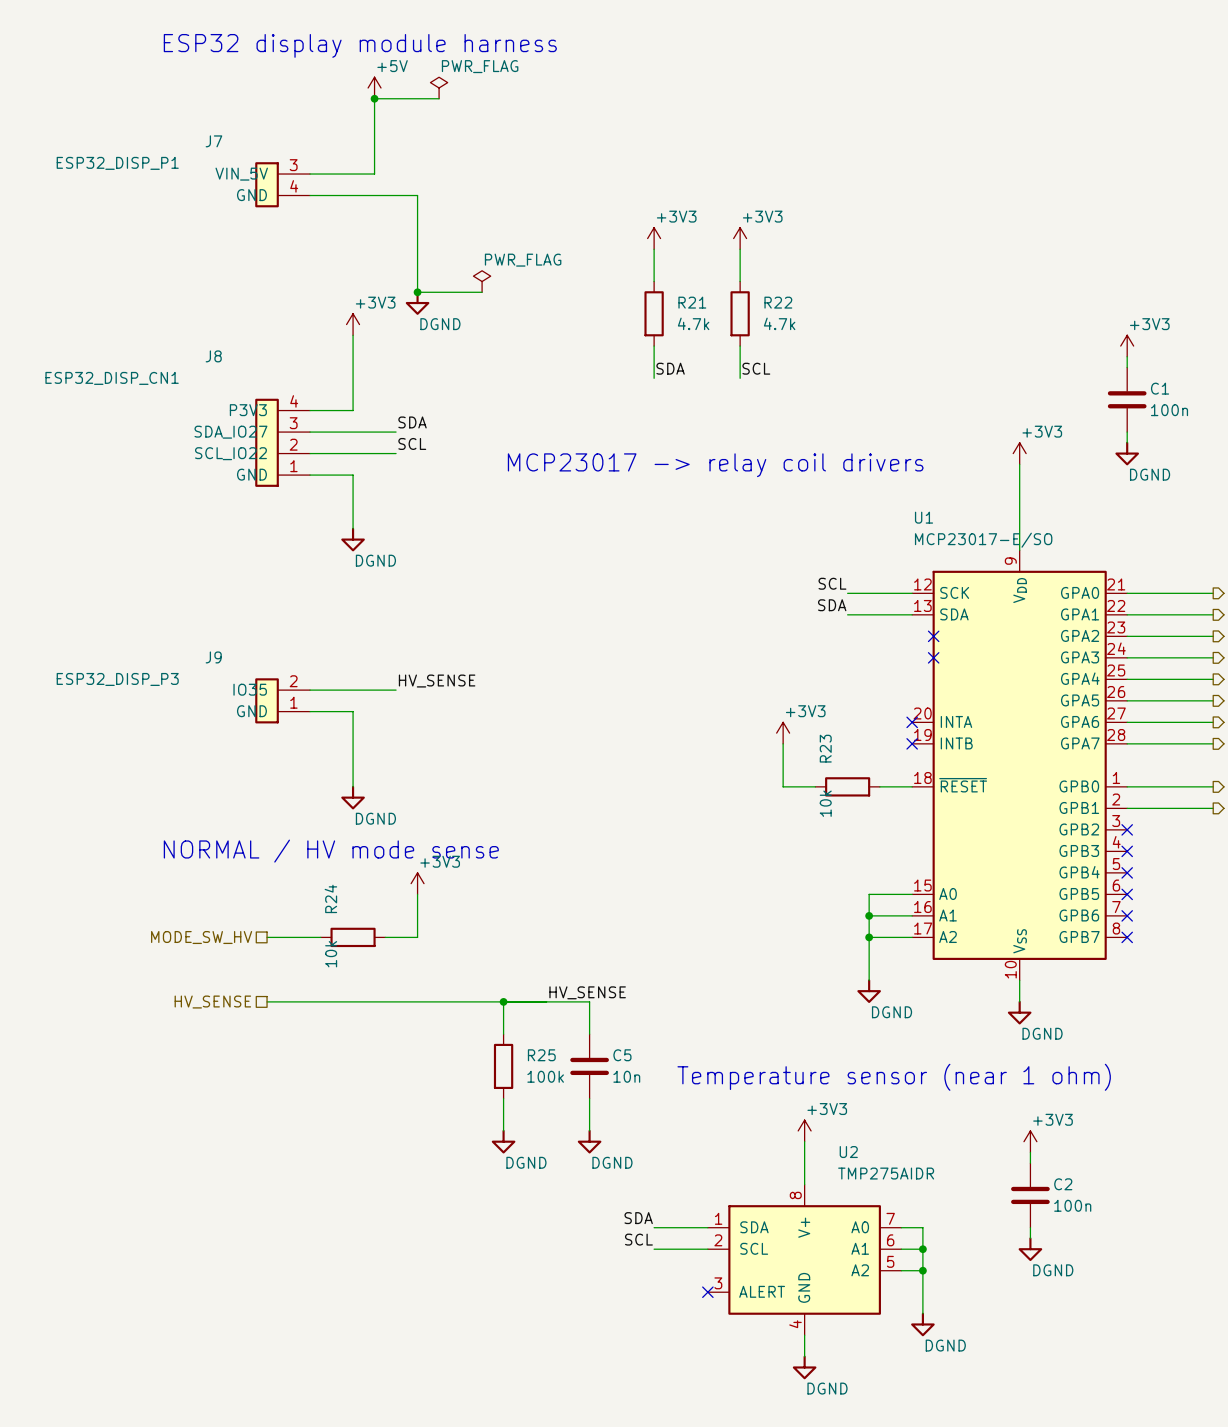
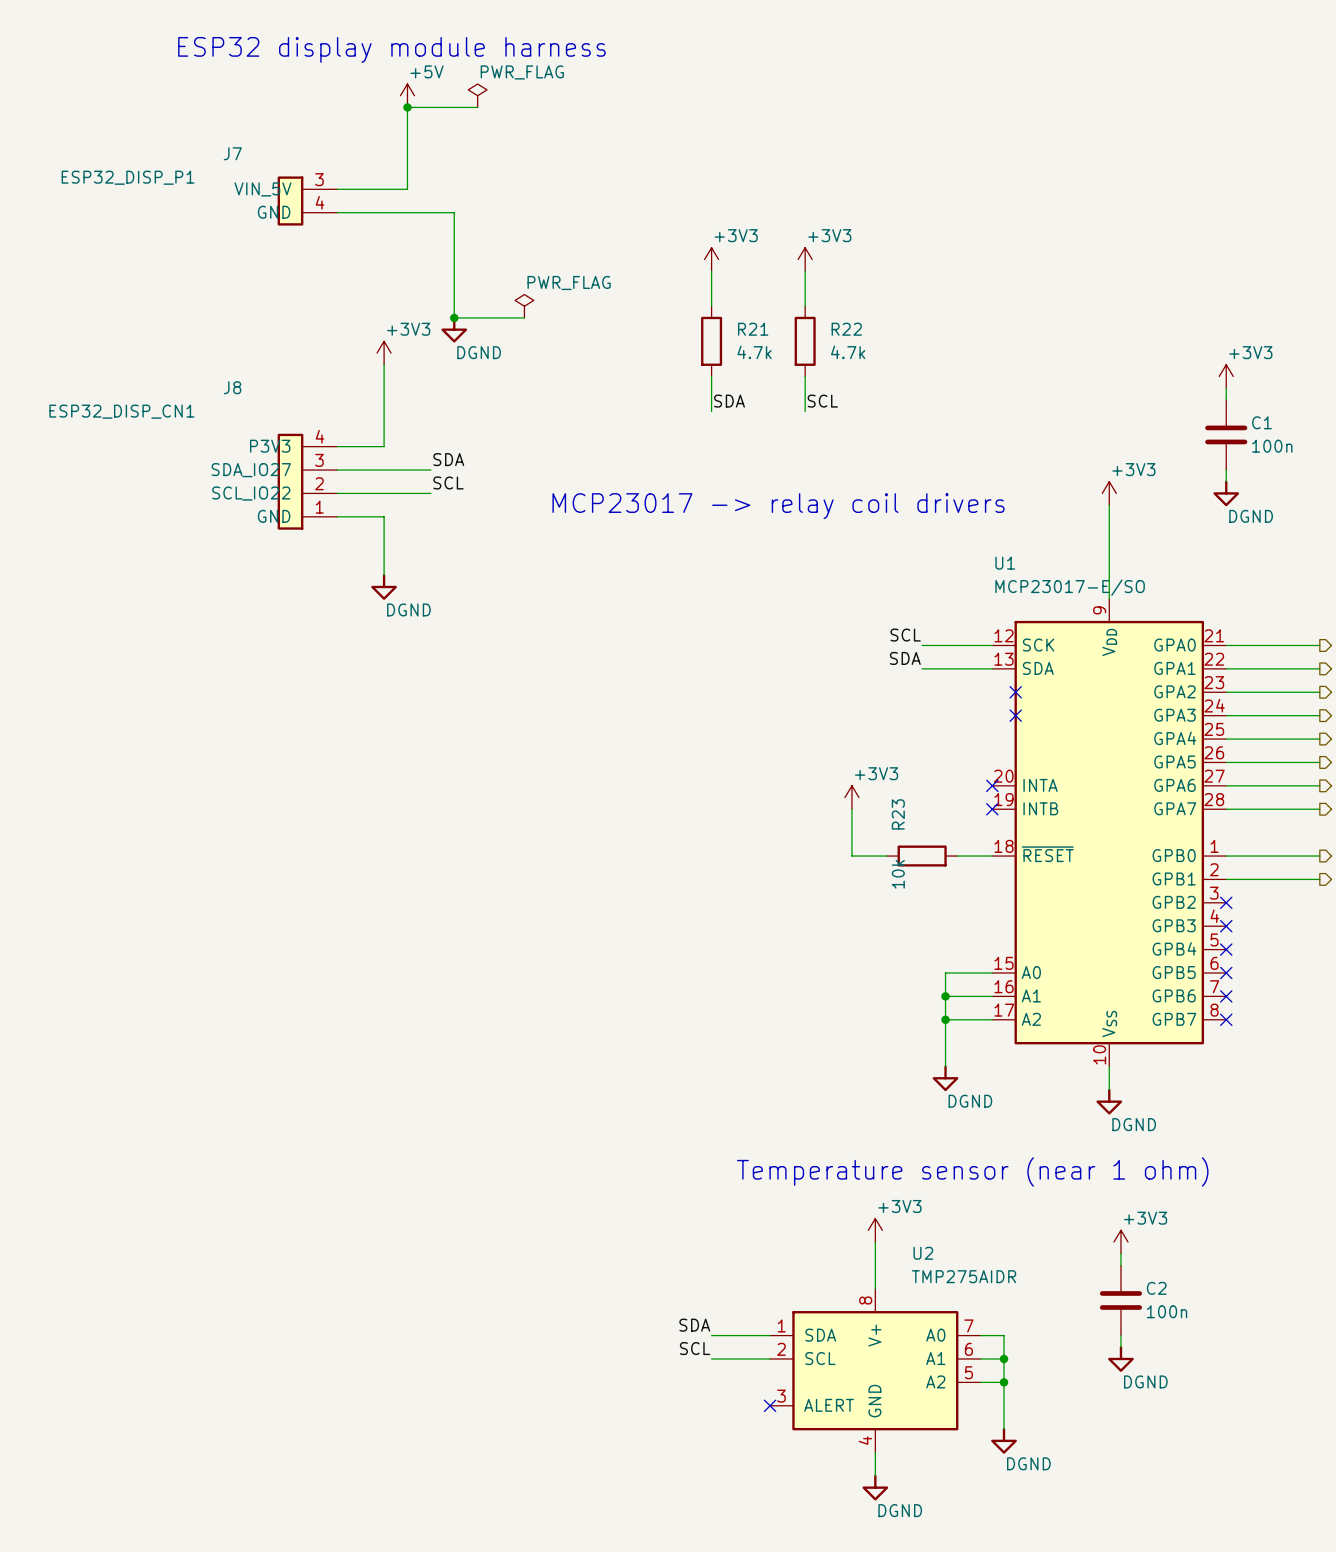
label: HV_SENSE (437, 681) -> none
wire: (310, 690) (396, 690) -> none
J9: ESP32_DISP_P3 (282, 700) -> none
wire: (310, 711) (353, 711) (353, 786) -> none
power symbol: DGND (353, 797) -> none
text: NORMAL / HV mode sense (331, 851) -> none
power symbol: +3V3 (417, 883) -> none
wire: (417, 894) (417, 937) (385, 937) -> none
hierarchical label: MODE_SW_HV (201, 937) -> none
wire: (267, 937) (320, 937) -> none
R24: 10k (353, 937) -> none
label: HV_SENSE (587, 992) -> none
wire: (267, 1001) (589, 1001) (589, 1034) -> none
wire: (503, 1001) (503, 1034) -> none
junction: (503, 1001) -> none
hierarchical label: HV_SENSE (212, 1002) -> none
R25: 100k (503, 1066) -> none
C5: 10n (589, 1066) -> none
wire: (503, 1098) (503, 1130) -> none
wire: (589, 1098) (589, 1130) -> none
power symbol: DGND (503, 1141) -> none
power symbol: DGND (589, 1141) -> none

